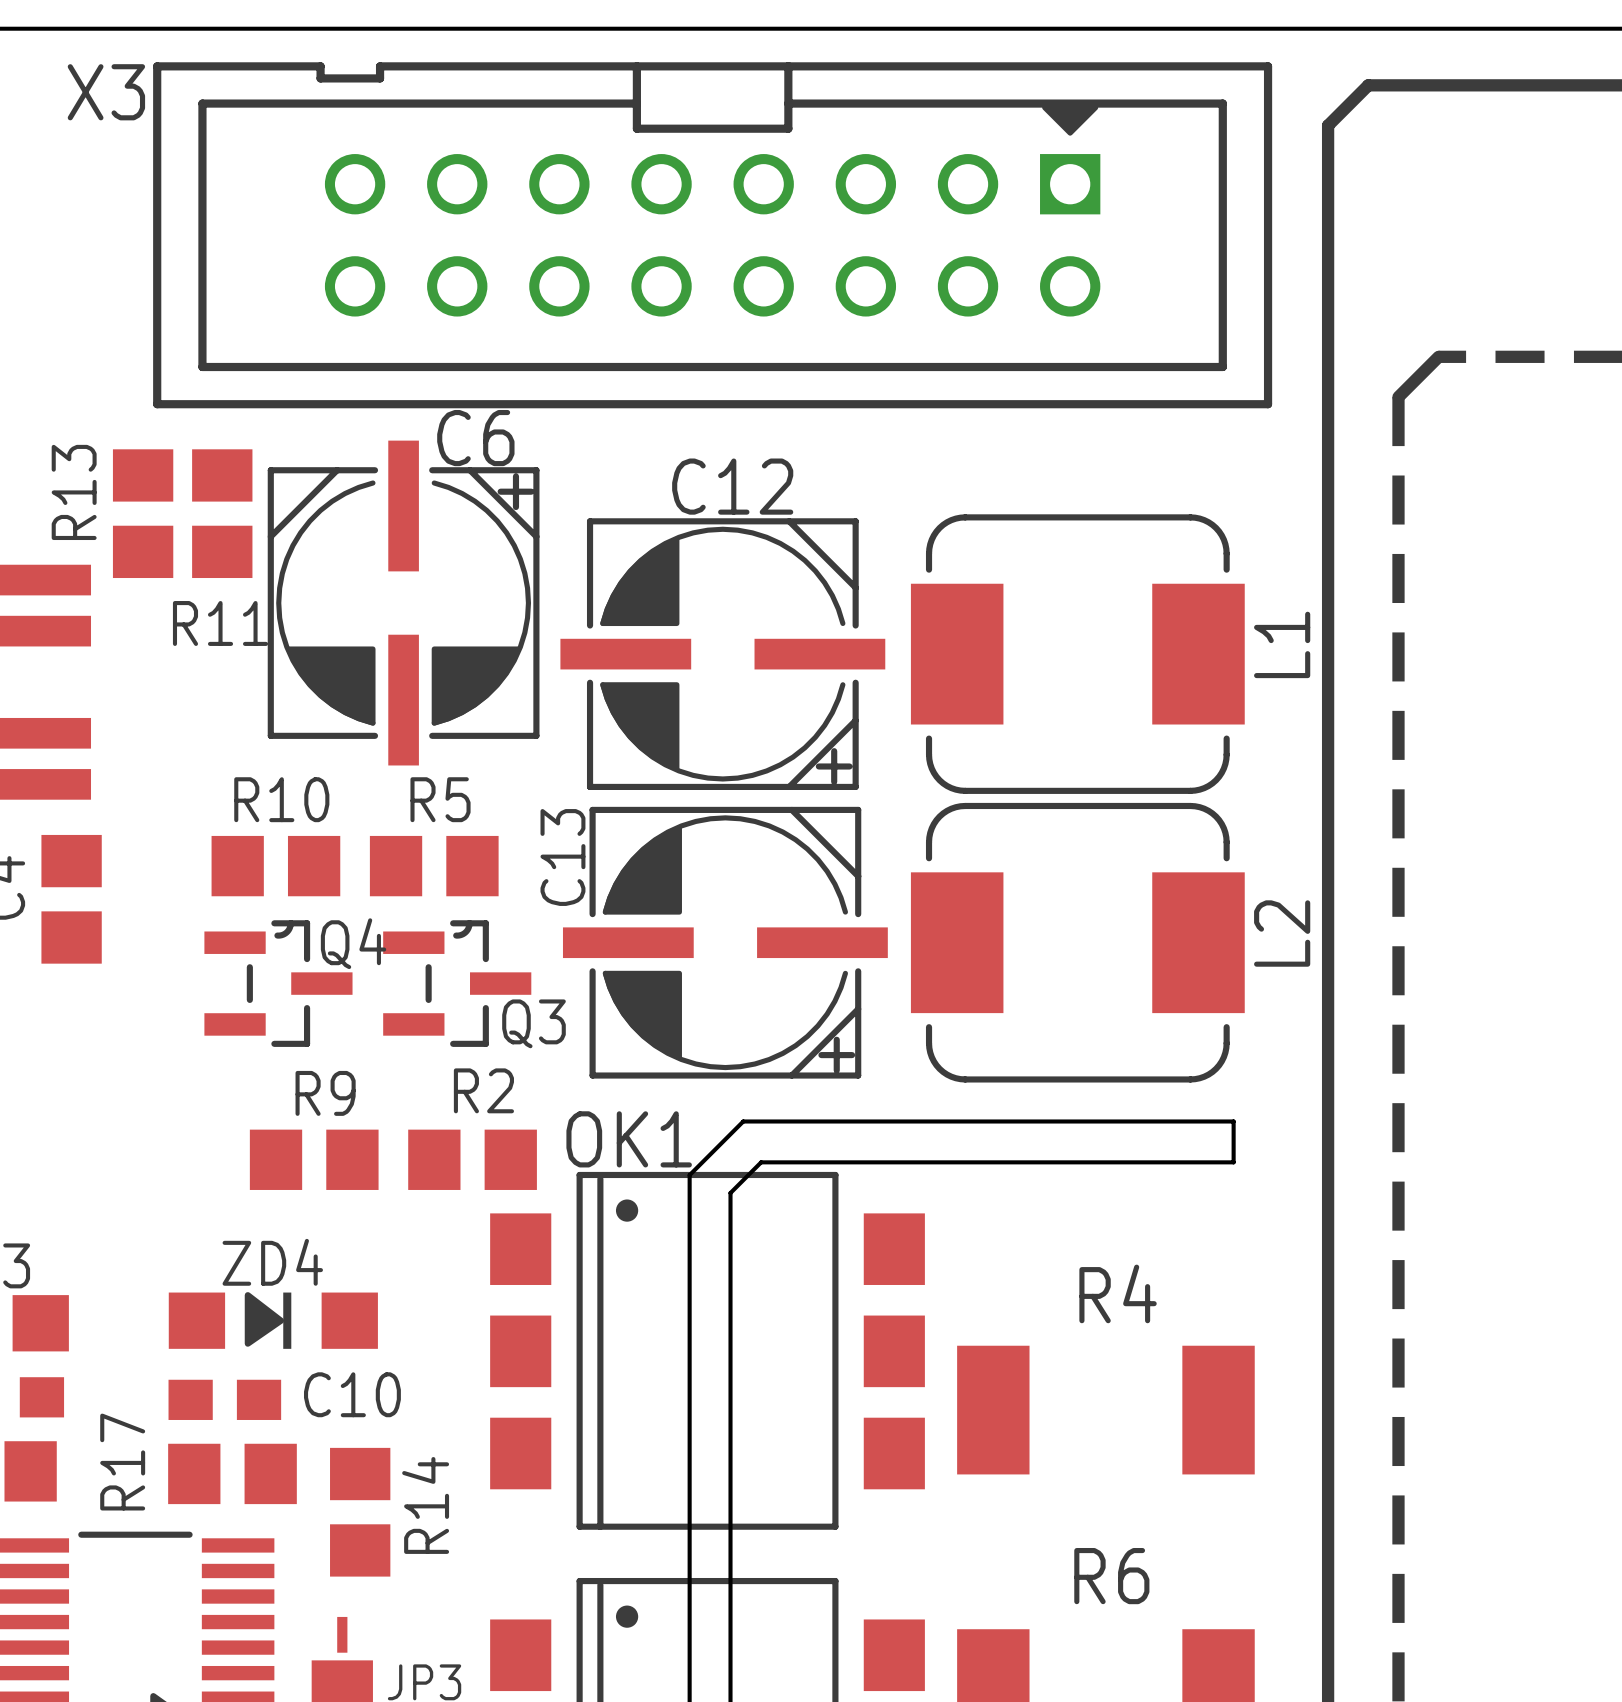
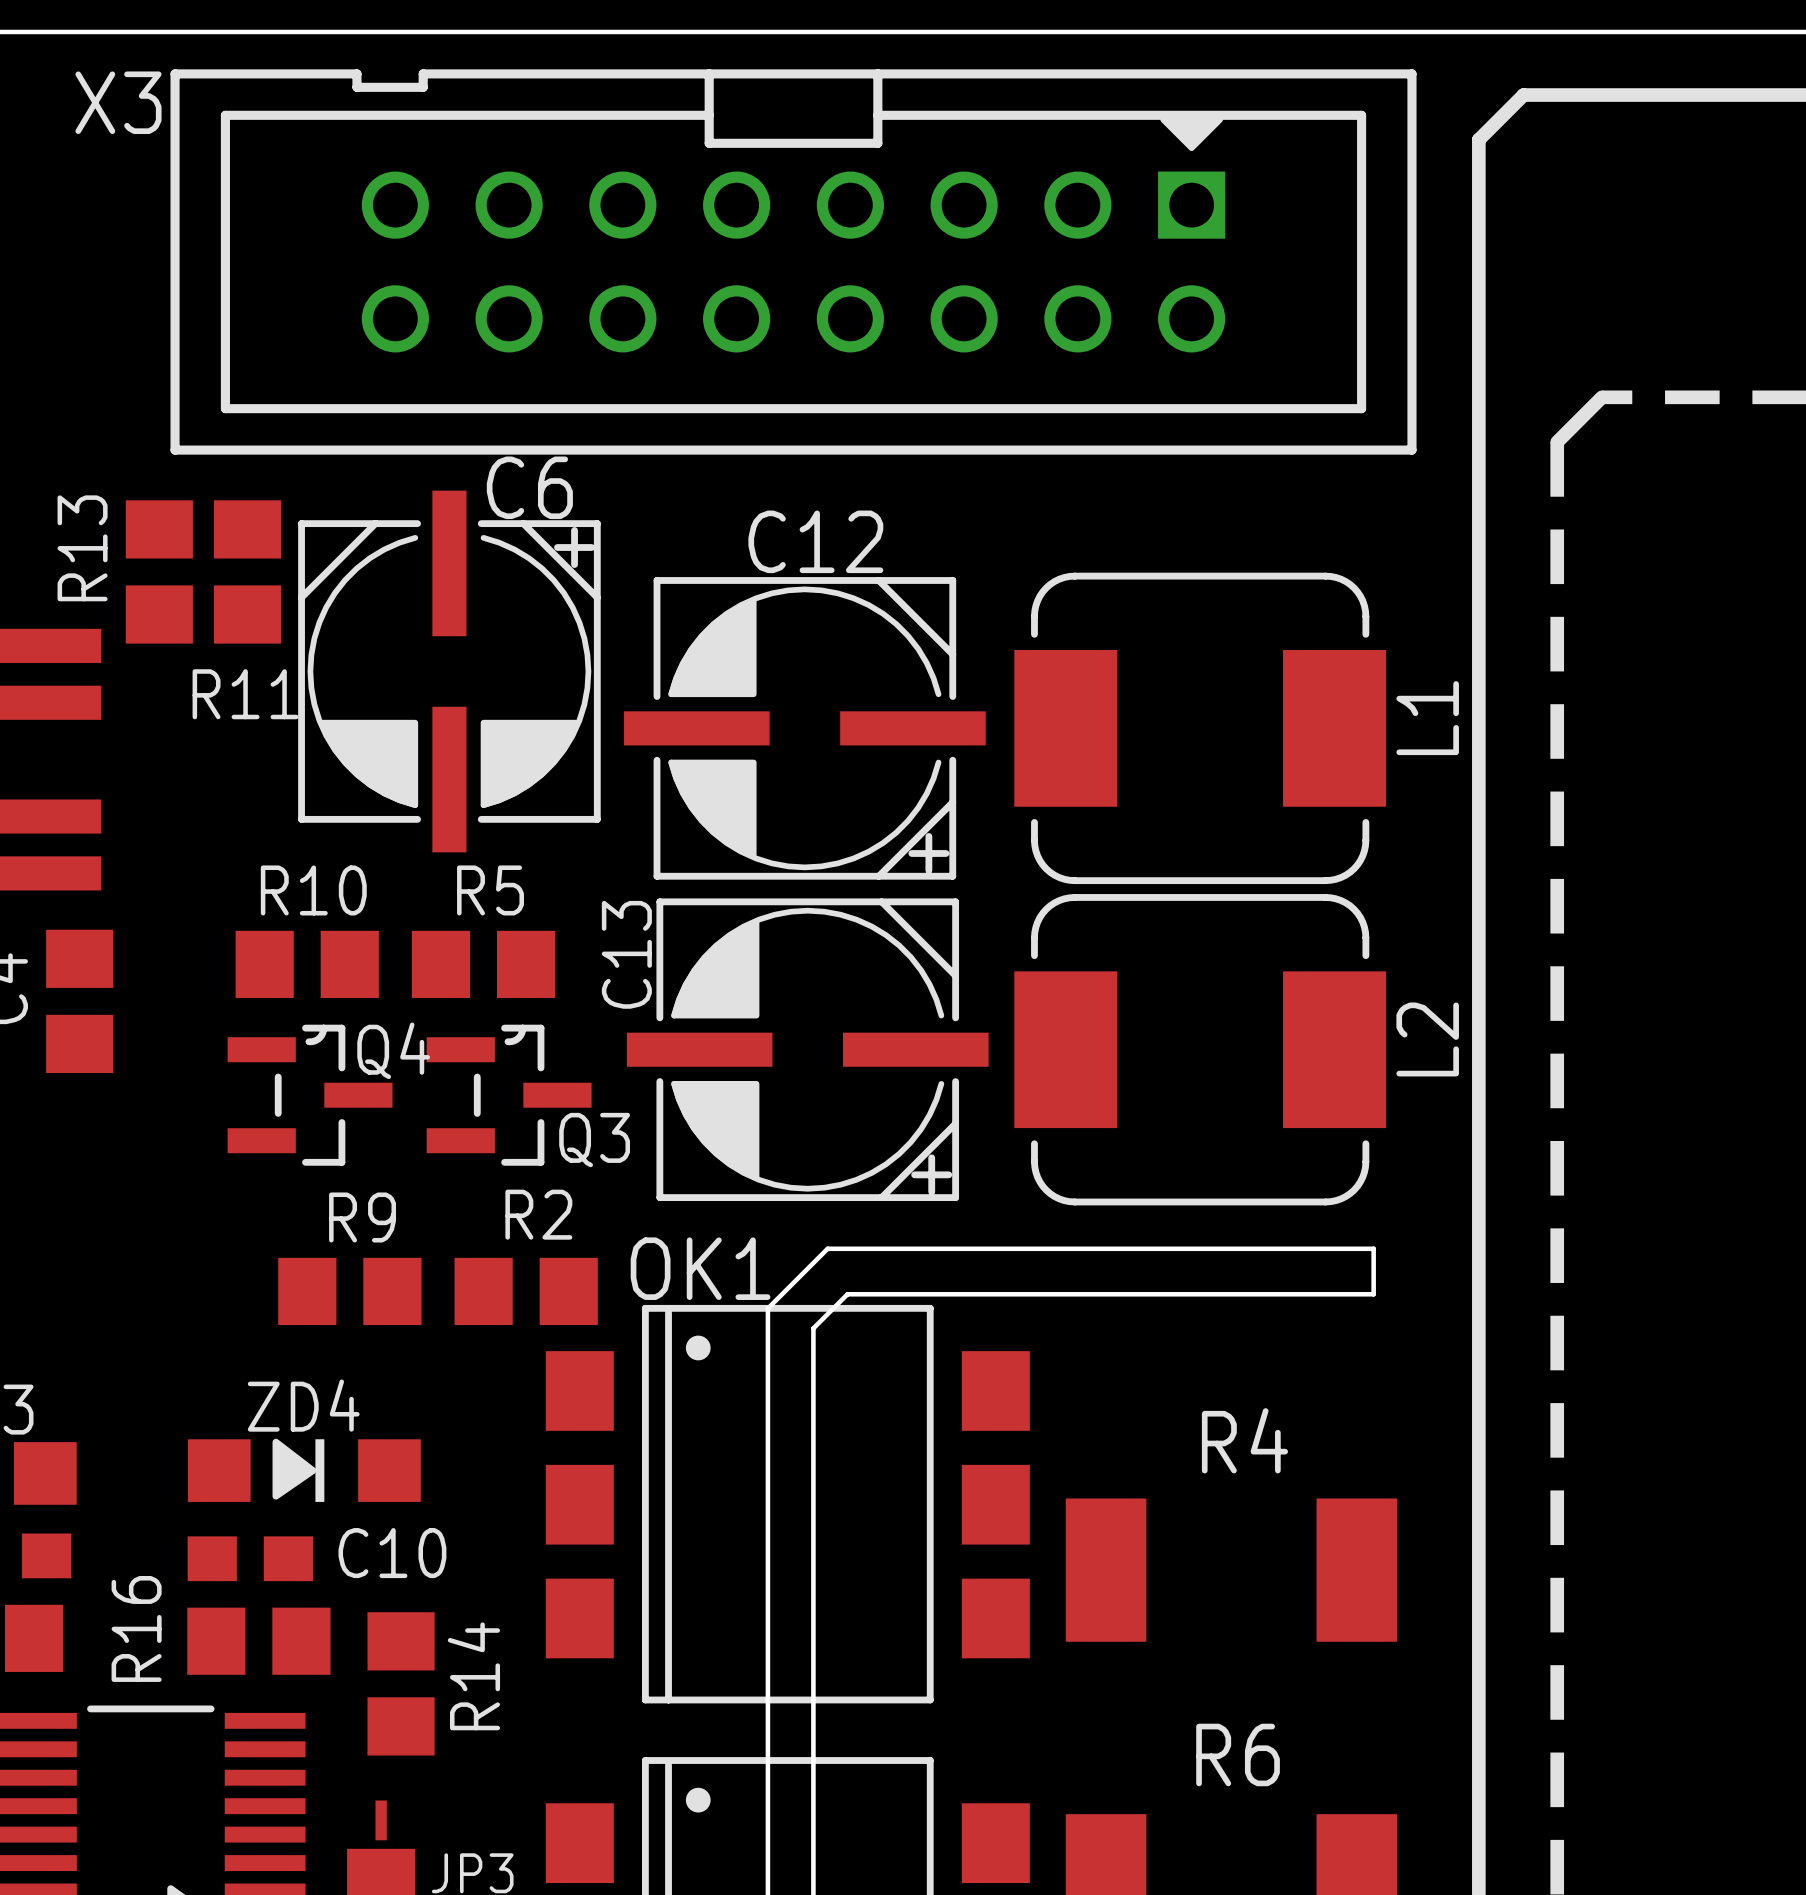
R17 name: R17 (122, 1462) -> R16 (136, 1628)

